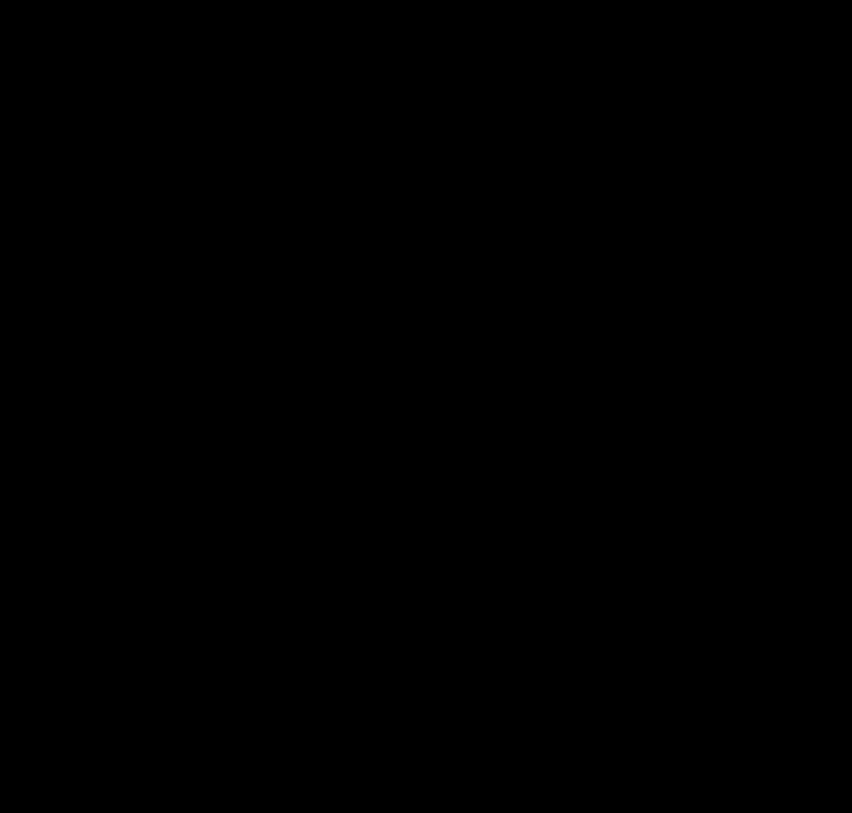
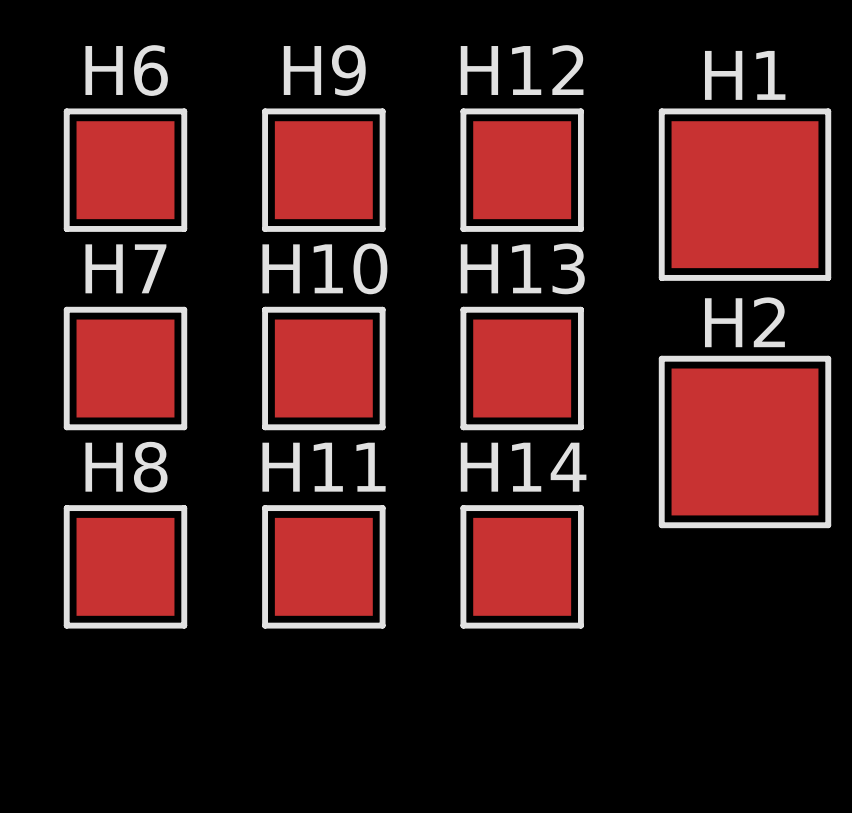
H6: none -> (125, 170)
H9: none -> (323, 170)
H12: none -> (522, 170)
H1: none -> (745, 194)
H7: none -> (125, 368)
H10: none -> (323, 368)
H13: none -> (522, 368)
H2: none -> (745, 441)
H8: none -> (125, 566)
H11: none -> (323, 566)
H14: none -> (522, 566)

